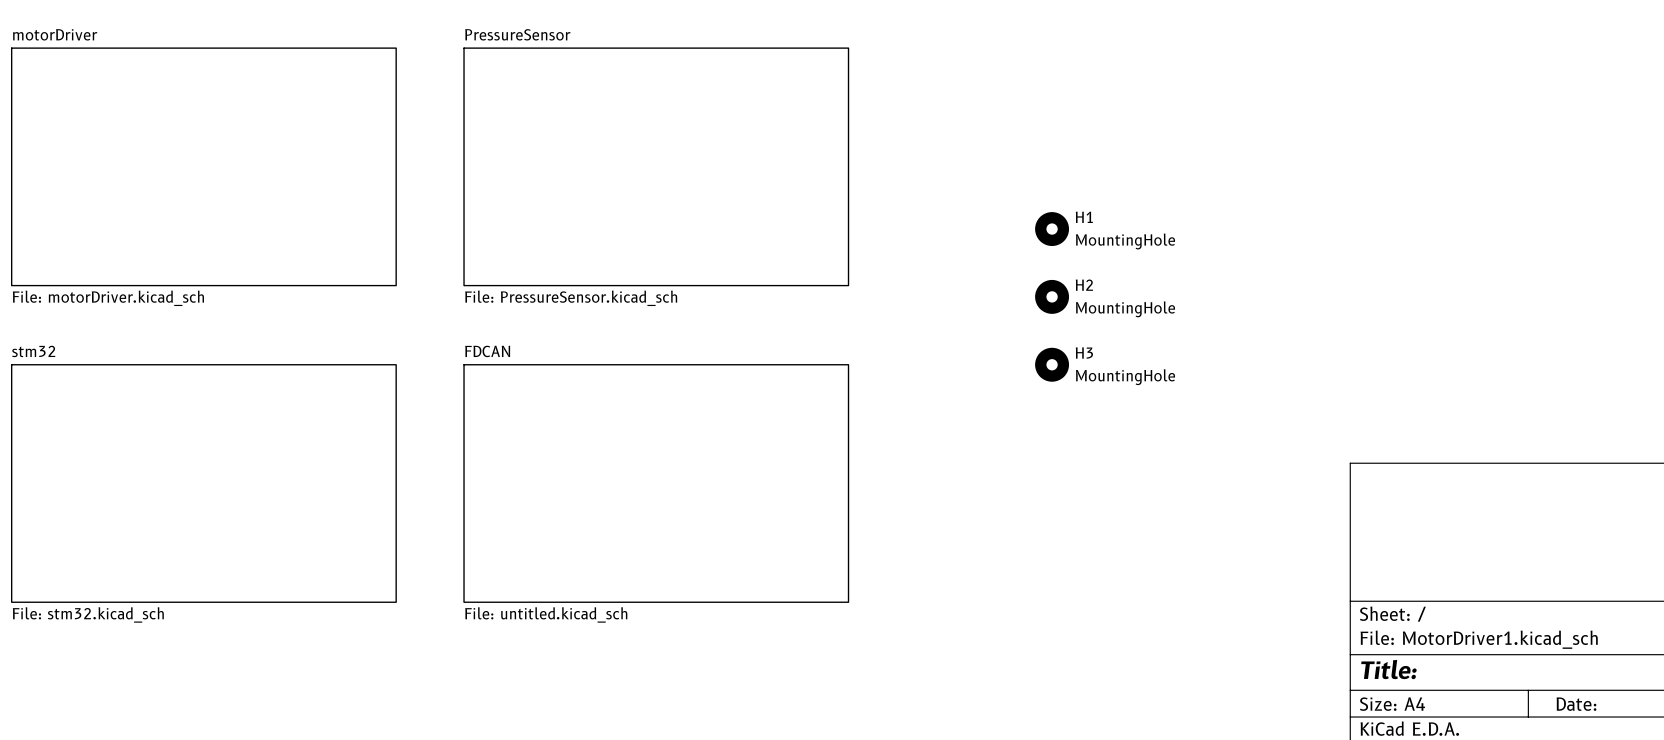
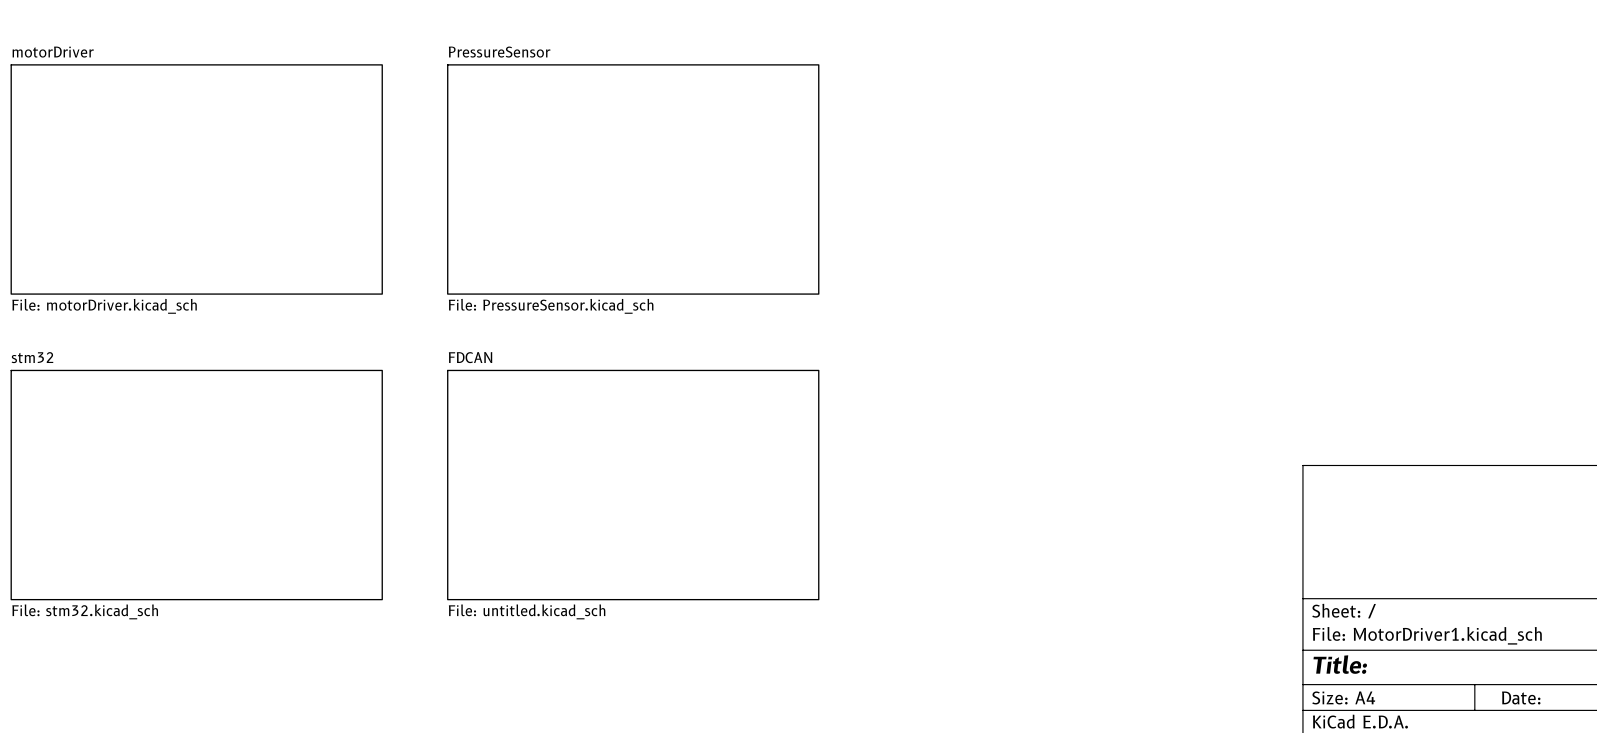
H1: MountingHole (1052, 229) -> none
H2: MountingHole (1052, 296) -> none
H3: MountingHole (1052, 364) -> none

